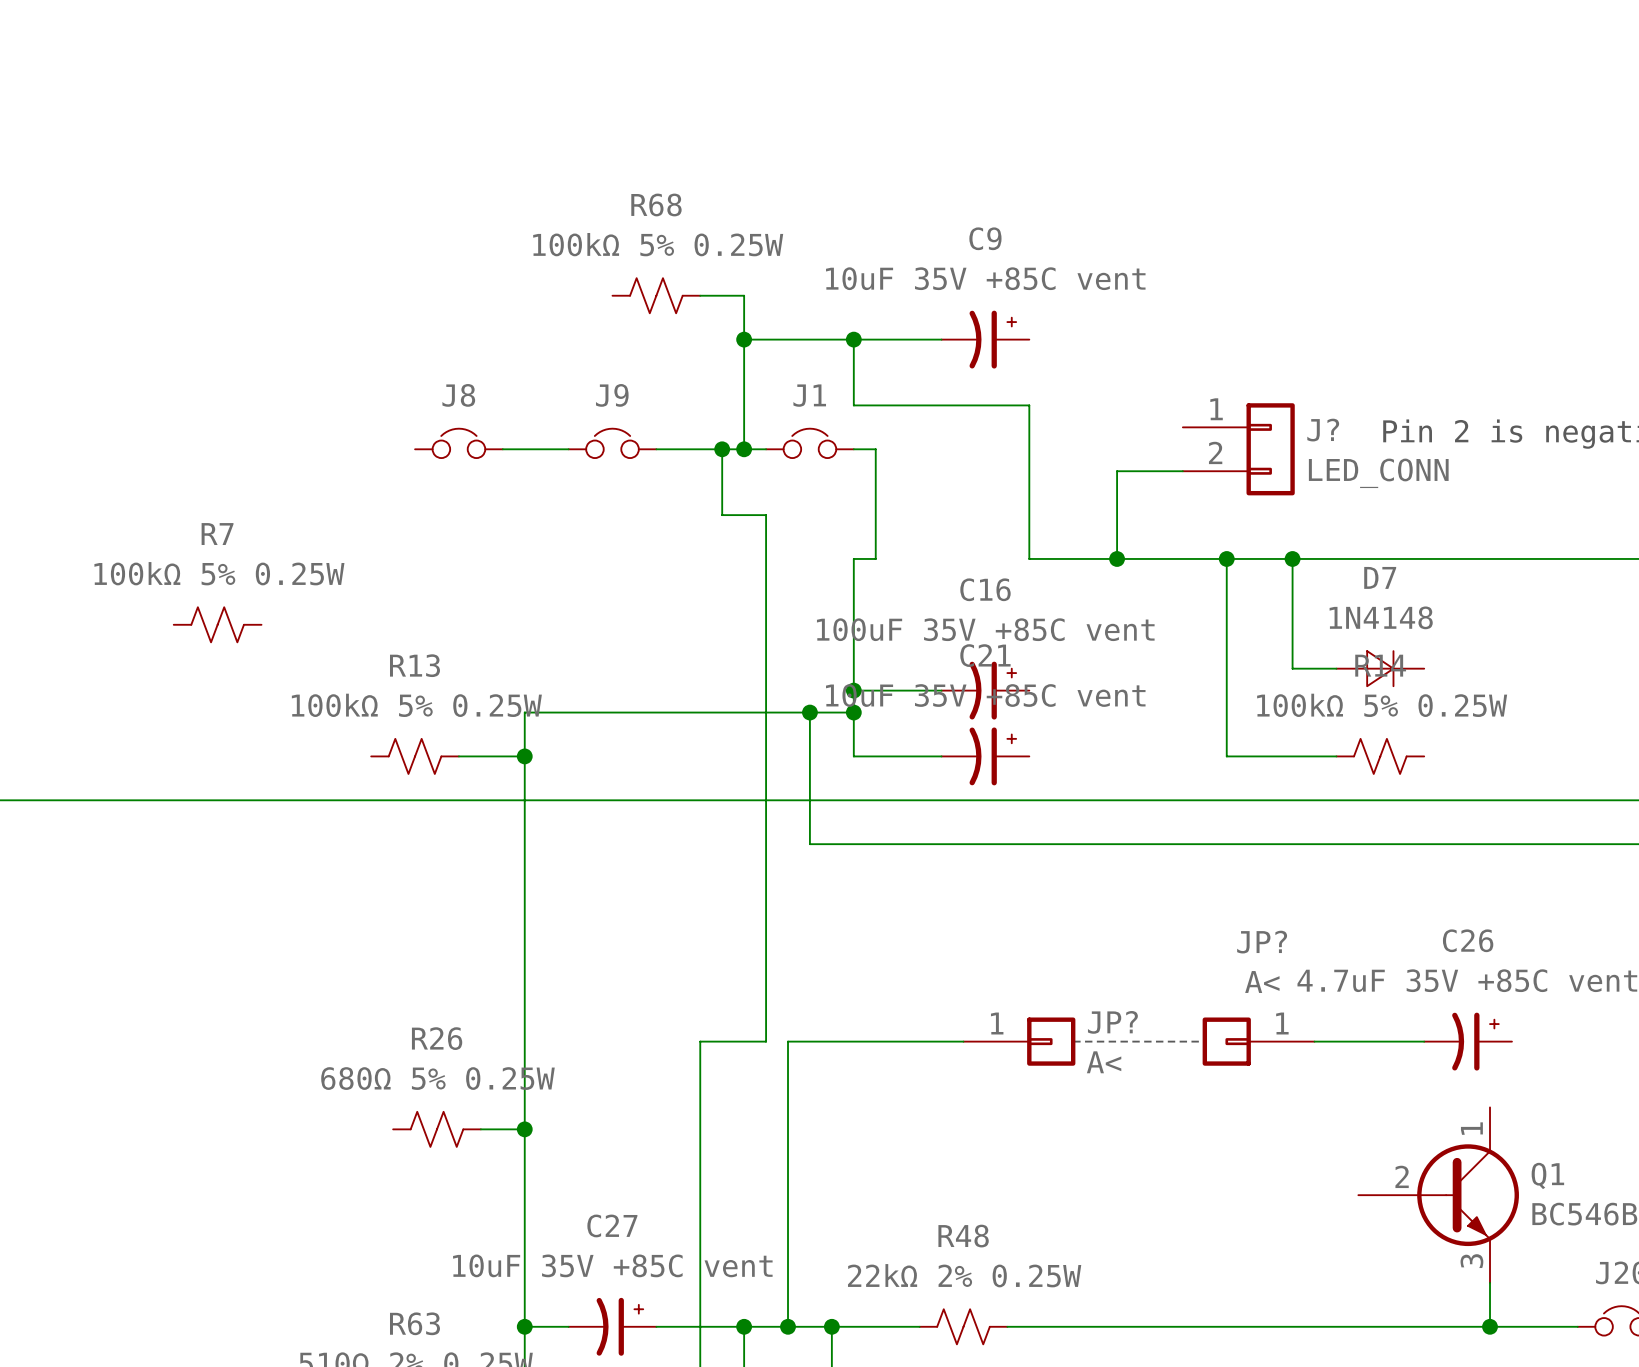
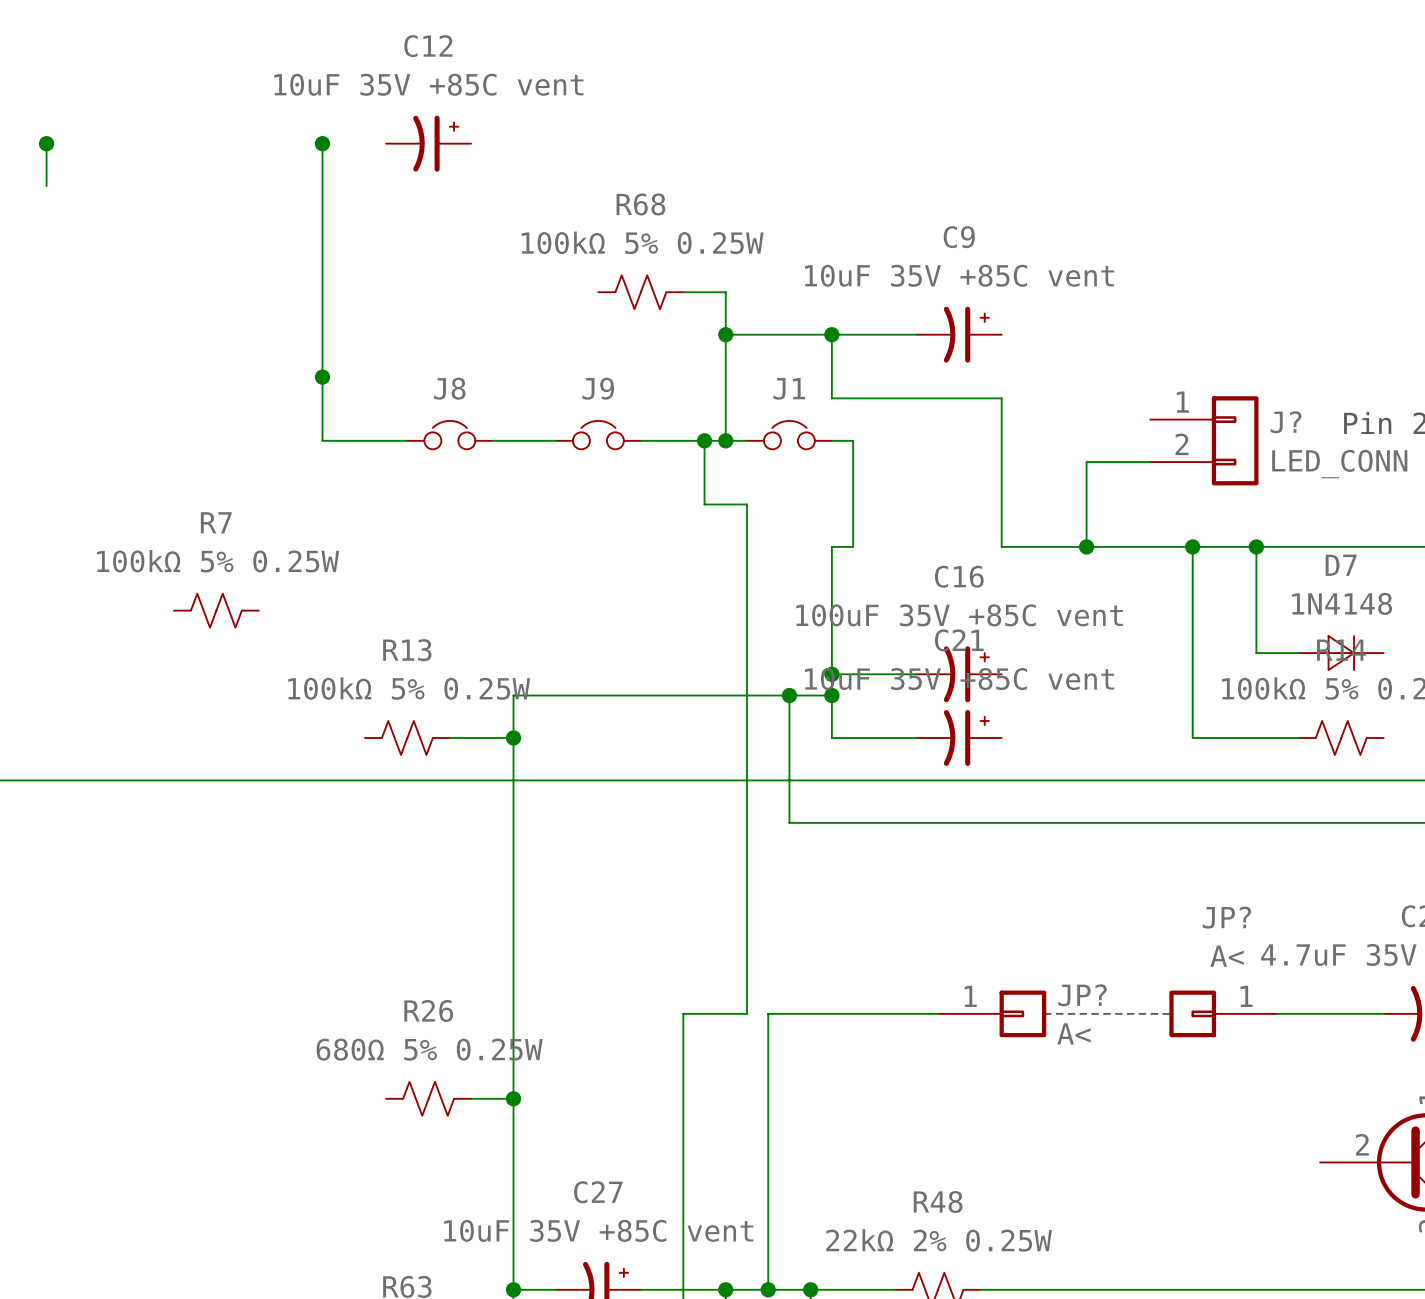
wire: none -> (46, 143) (46, 186)
junction: none -> (46, 143)
wire: none -> (322, 143) (322, 440) (407, 440)
junction: none -> (322, 143)
C12: none -> 10uF 35V +85C vent (428, 143)
junction: none -> (322, 377)

